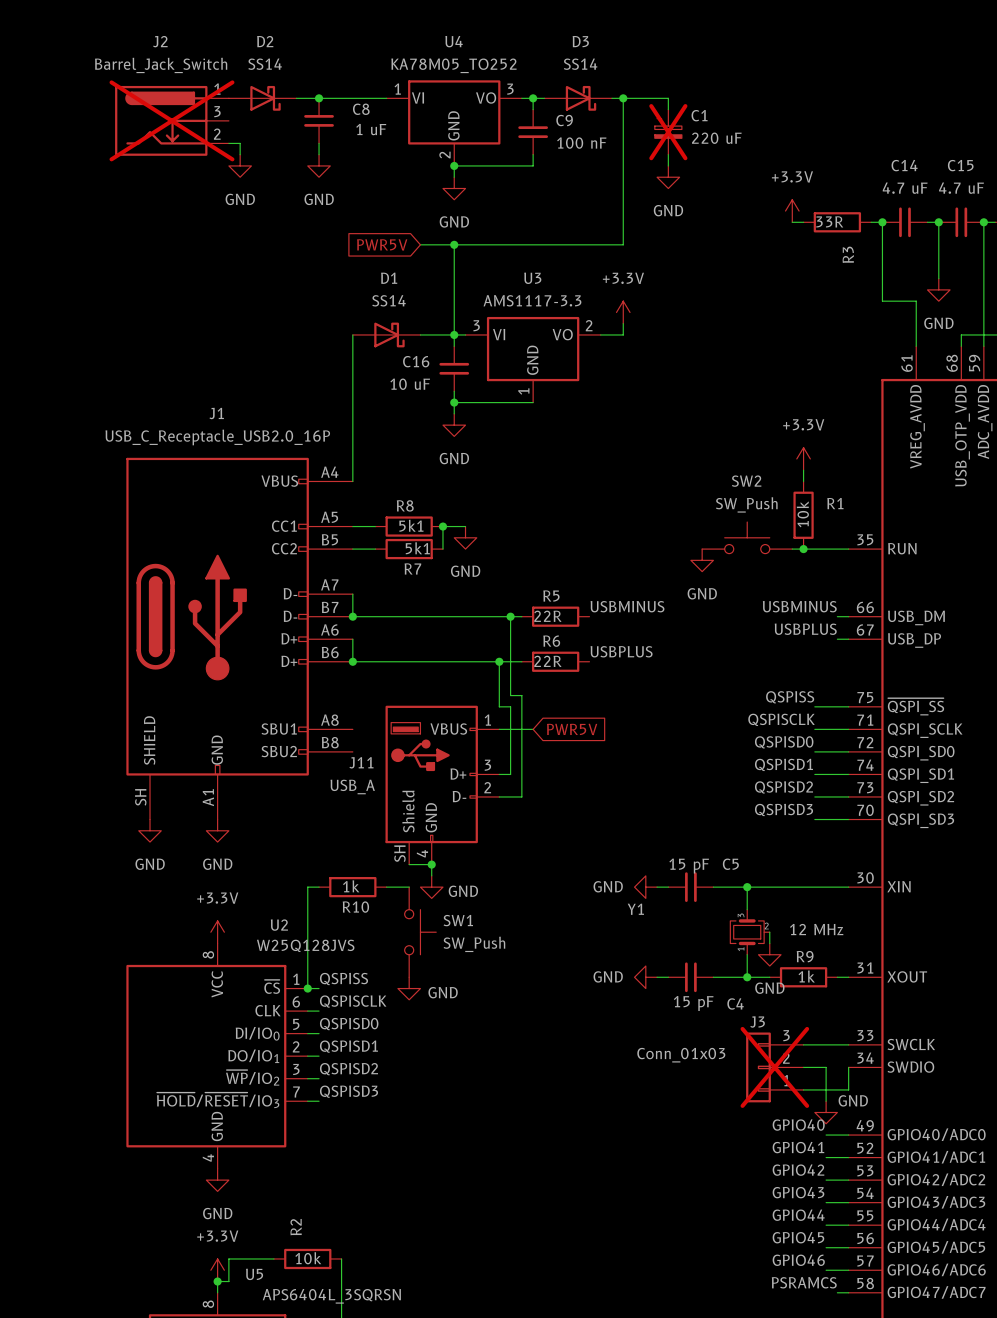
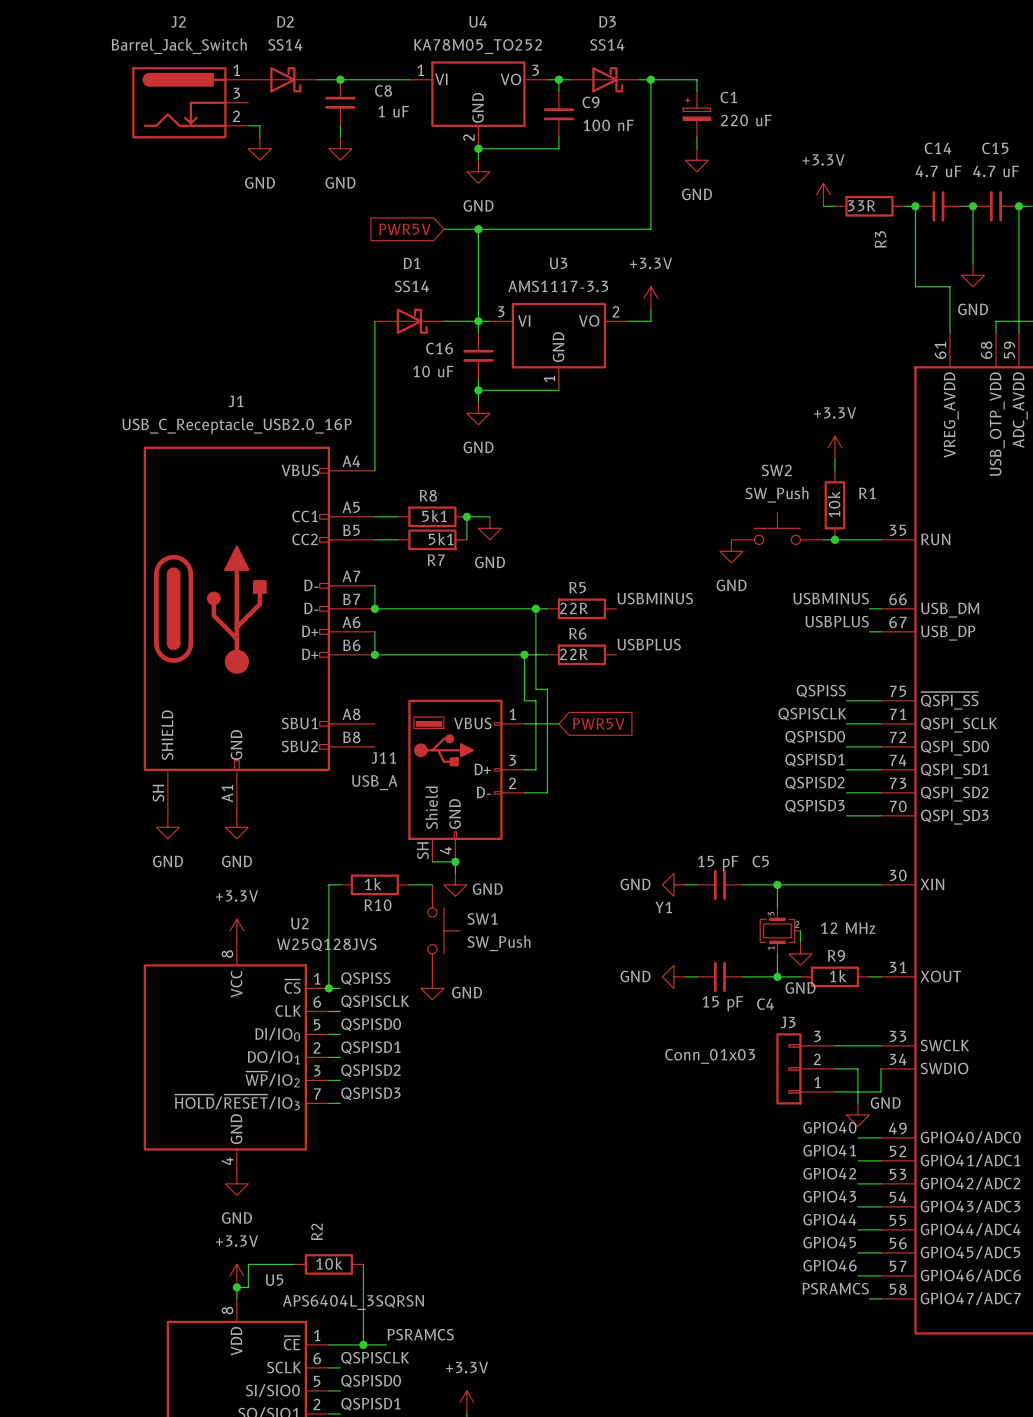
J2 do-not-place cross: (171, 120) -> none
C1 do-not-place cross: (668, 132) -> none
J3 do-not-place cross: (774, 1067) -> none

